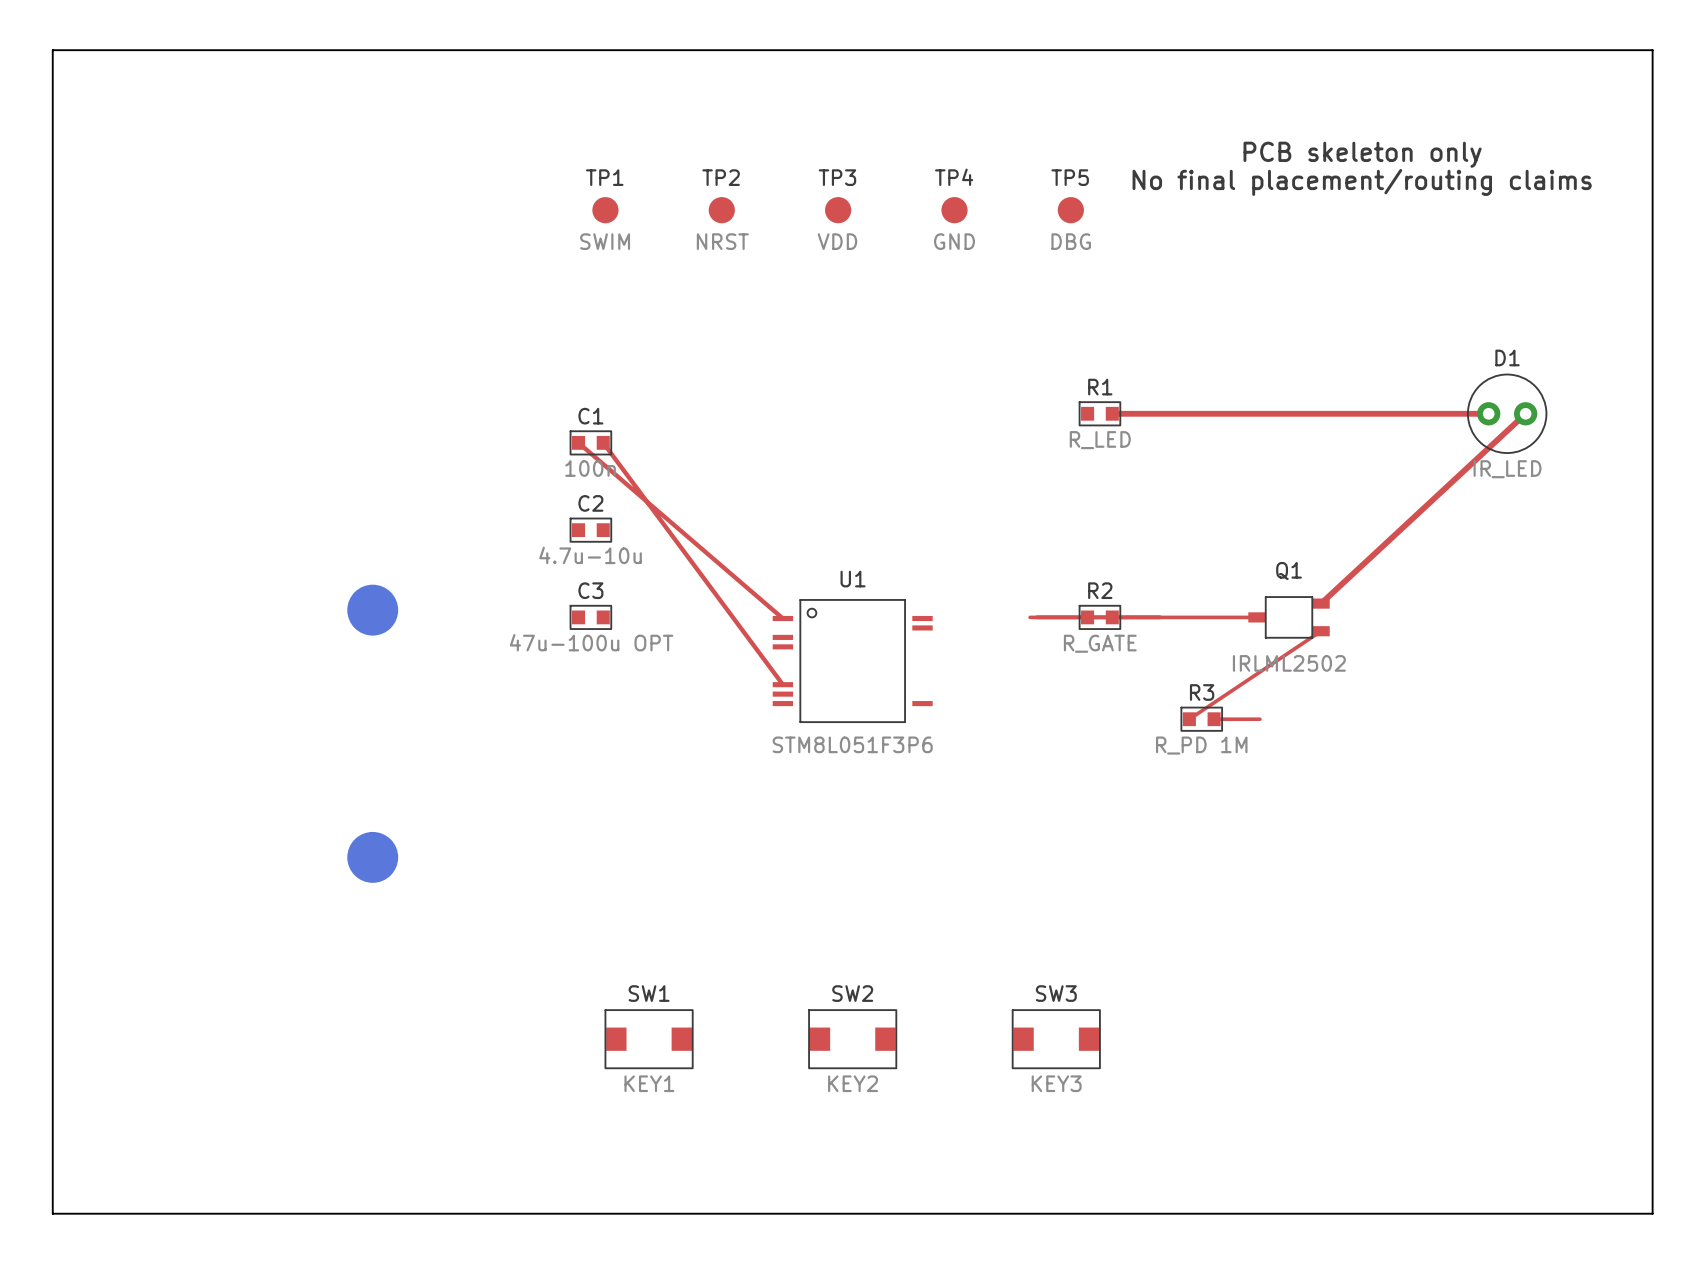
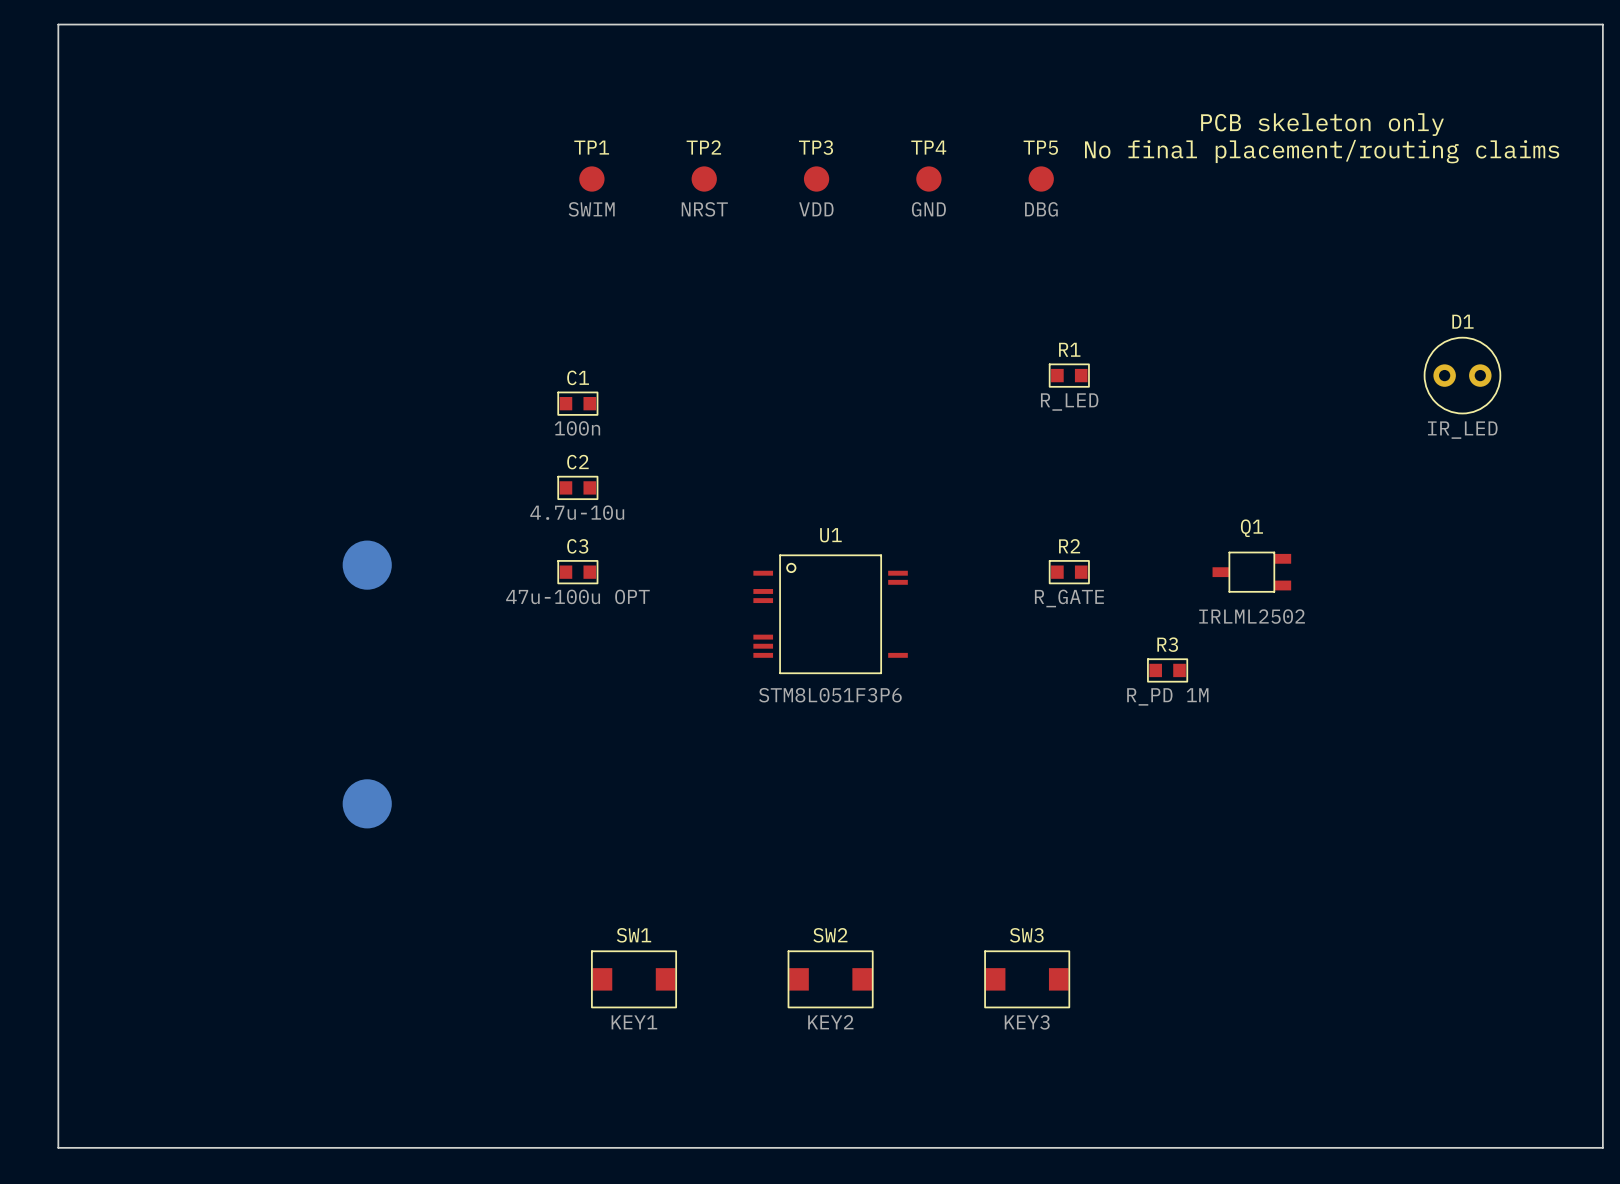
top track: (1112, 413) (1488, 413) -> none
top track: (1525, 413) (1321, 603) -> none
top track: (578, 442) (782, 618) -> none
top track: (603, 442) (782, 684) -> none
top track: (1030, 617) (1257, 617) -> none
top track: (1321, 631) (1189, 719) -> none
top track: (1214, 719) (1259, 719) -> none

